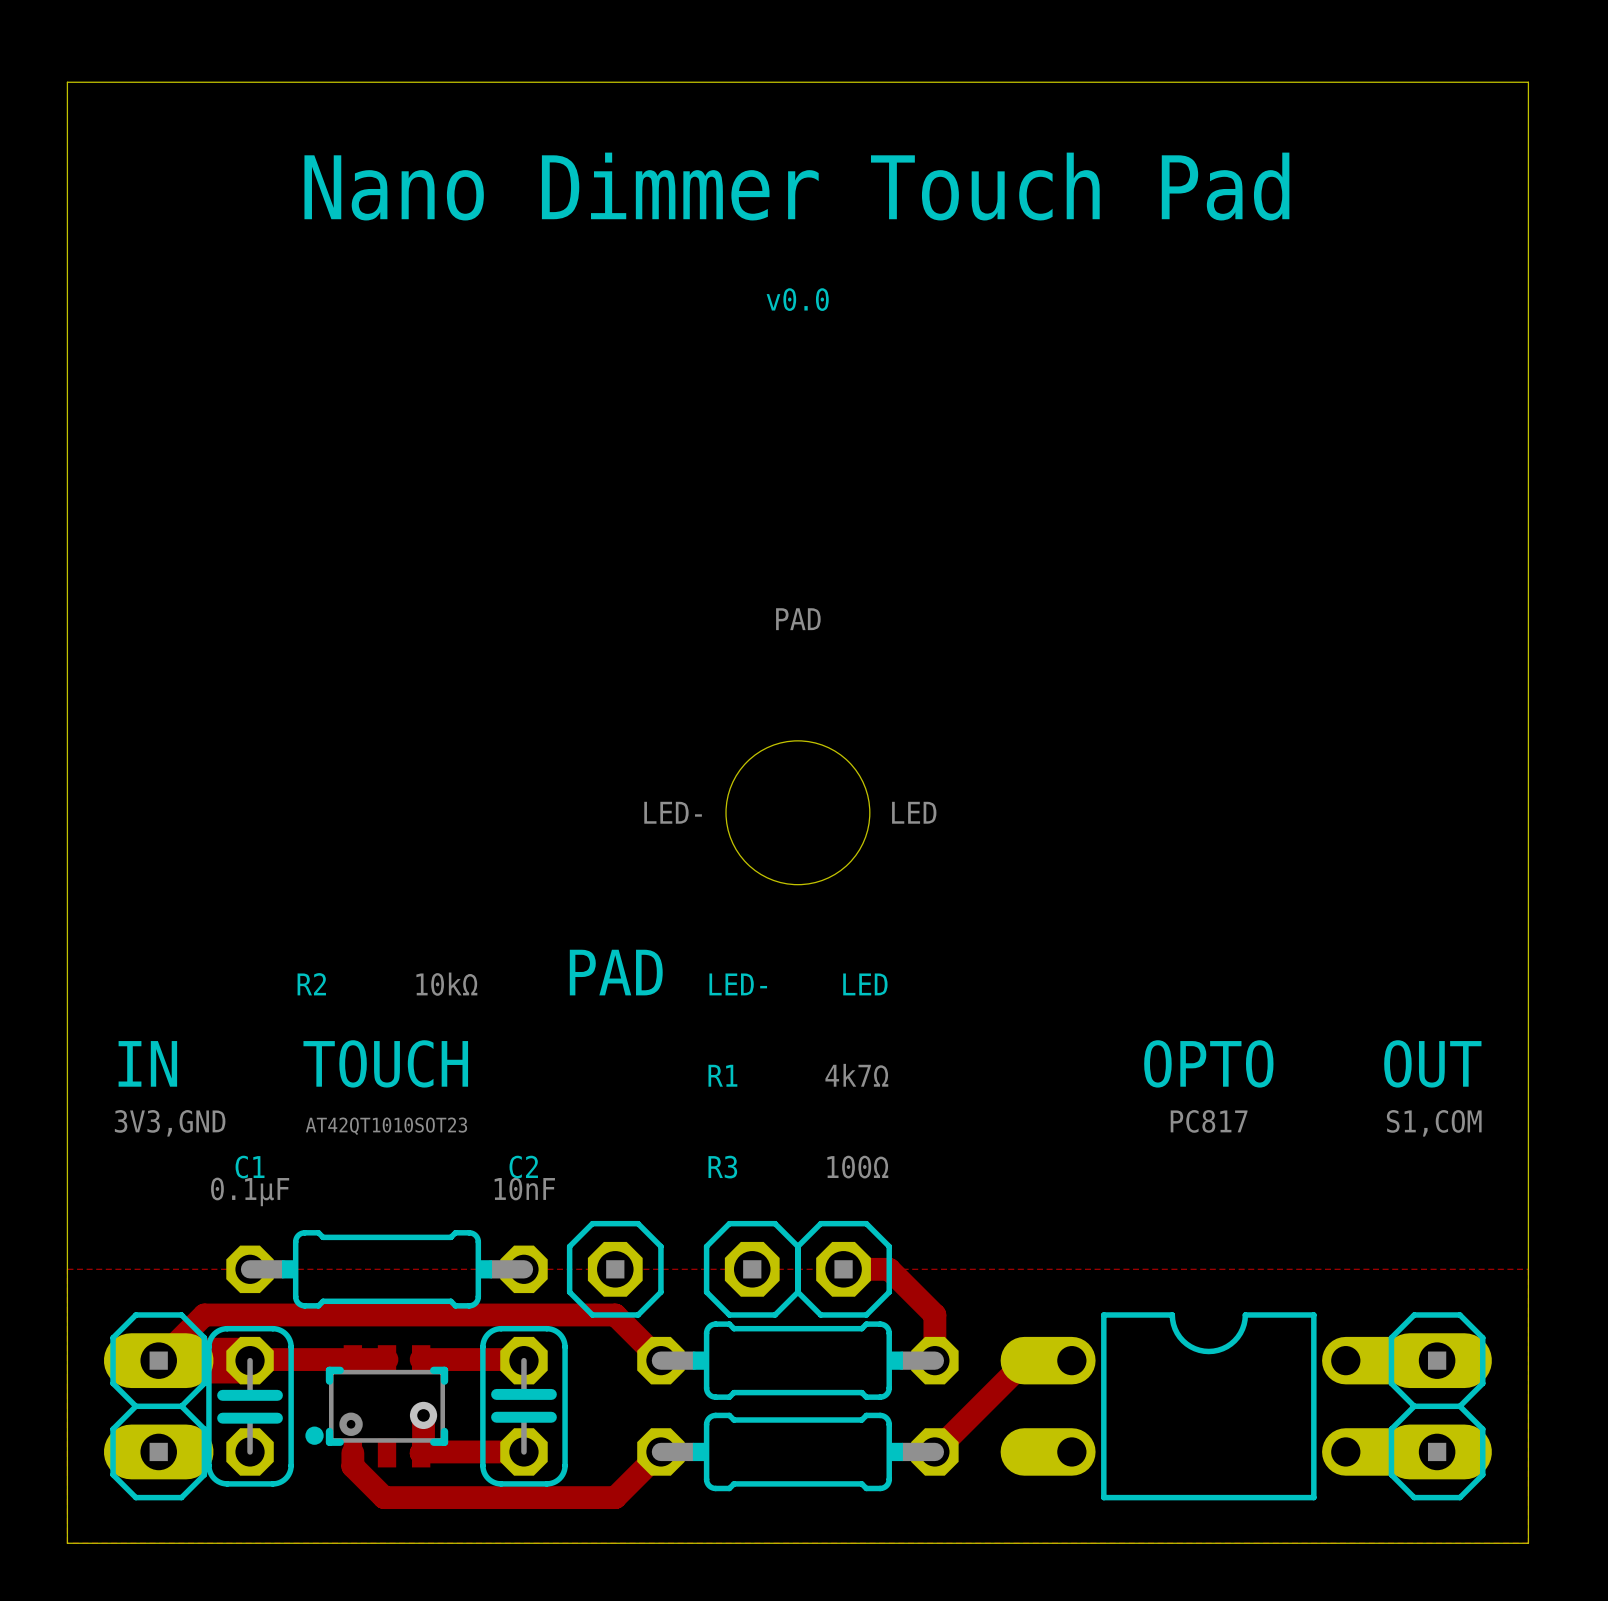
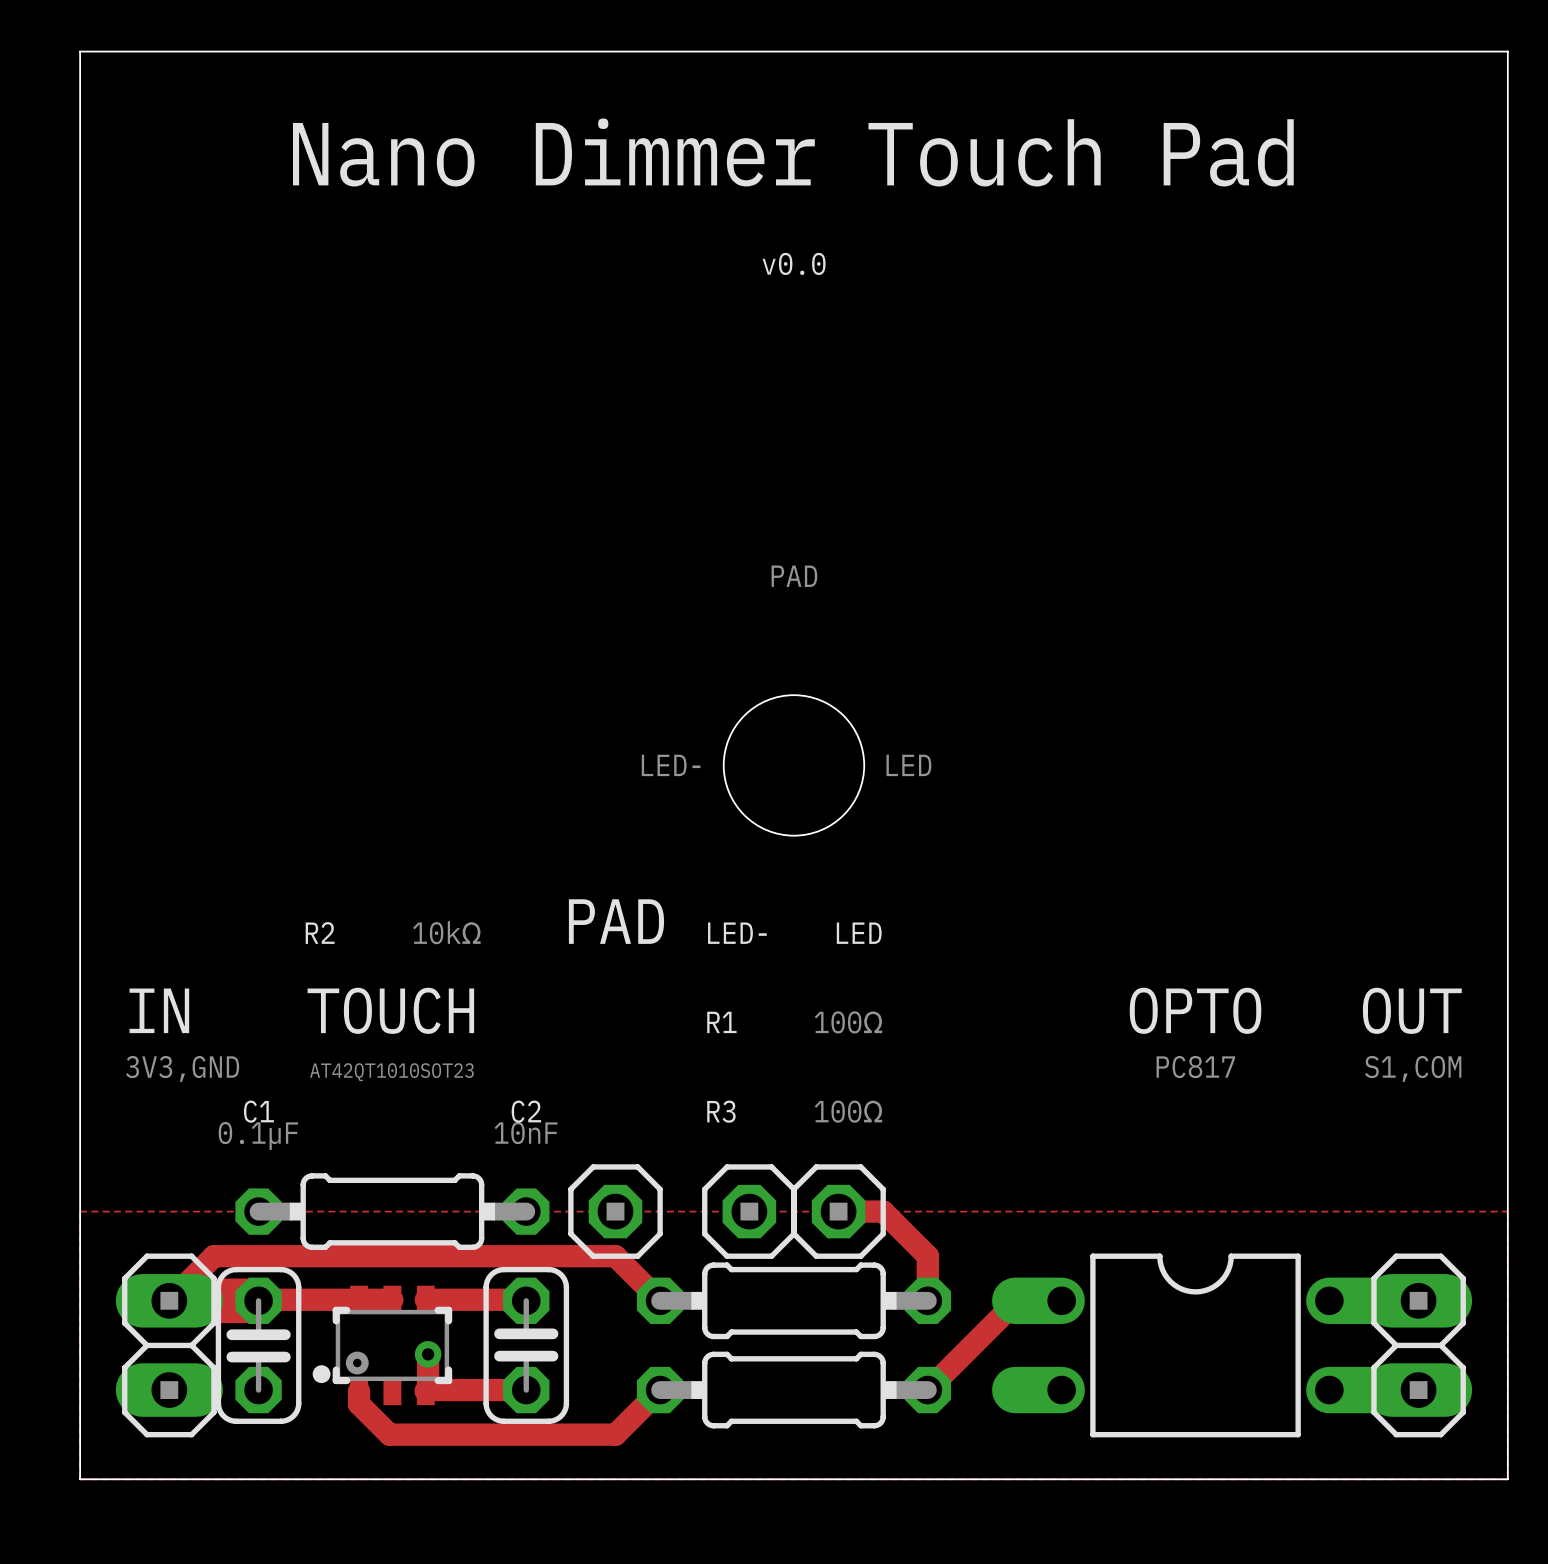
R1 value: 4k7Ω (856, 1075) -> 100Ω (848, 1022)

